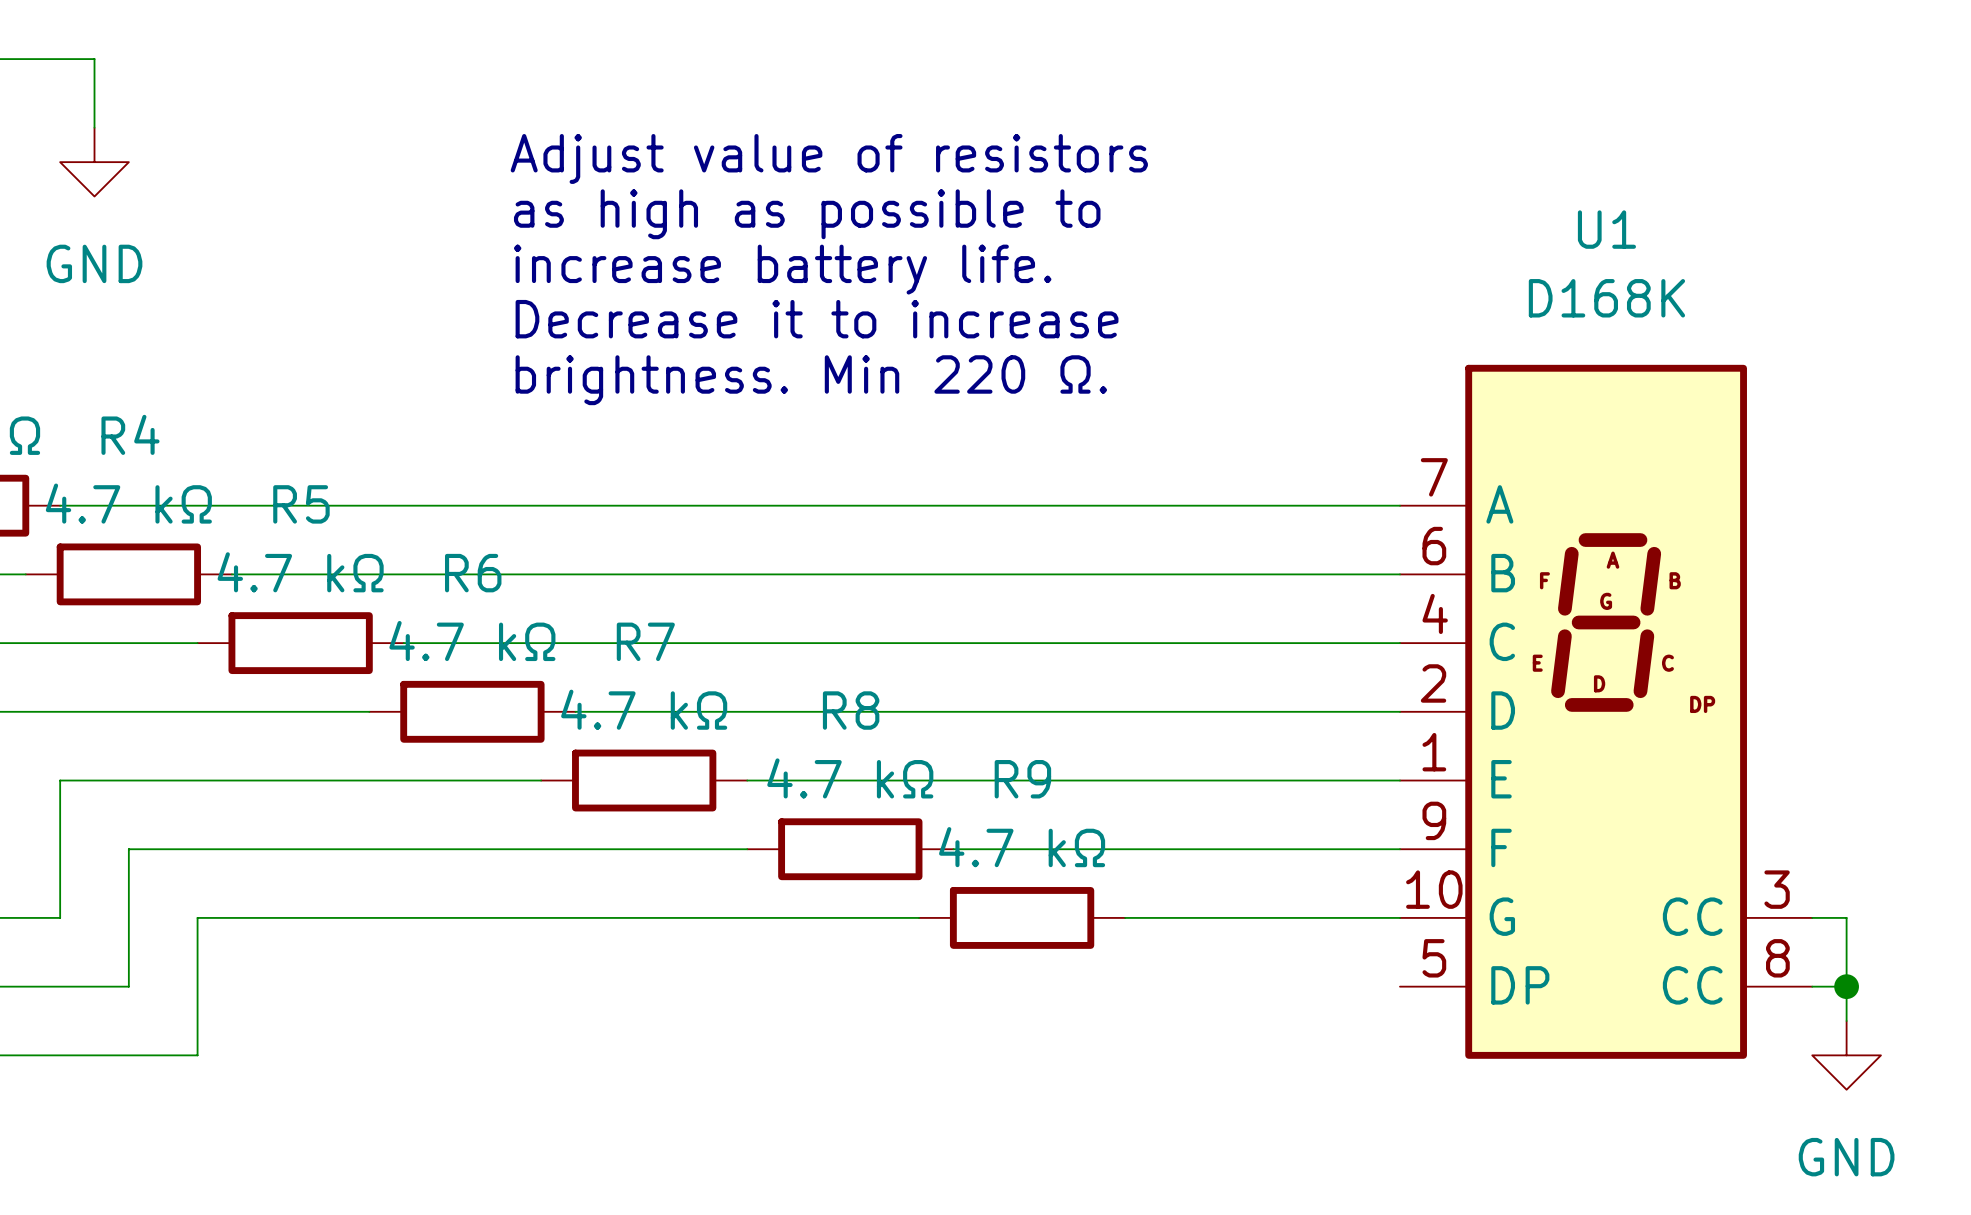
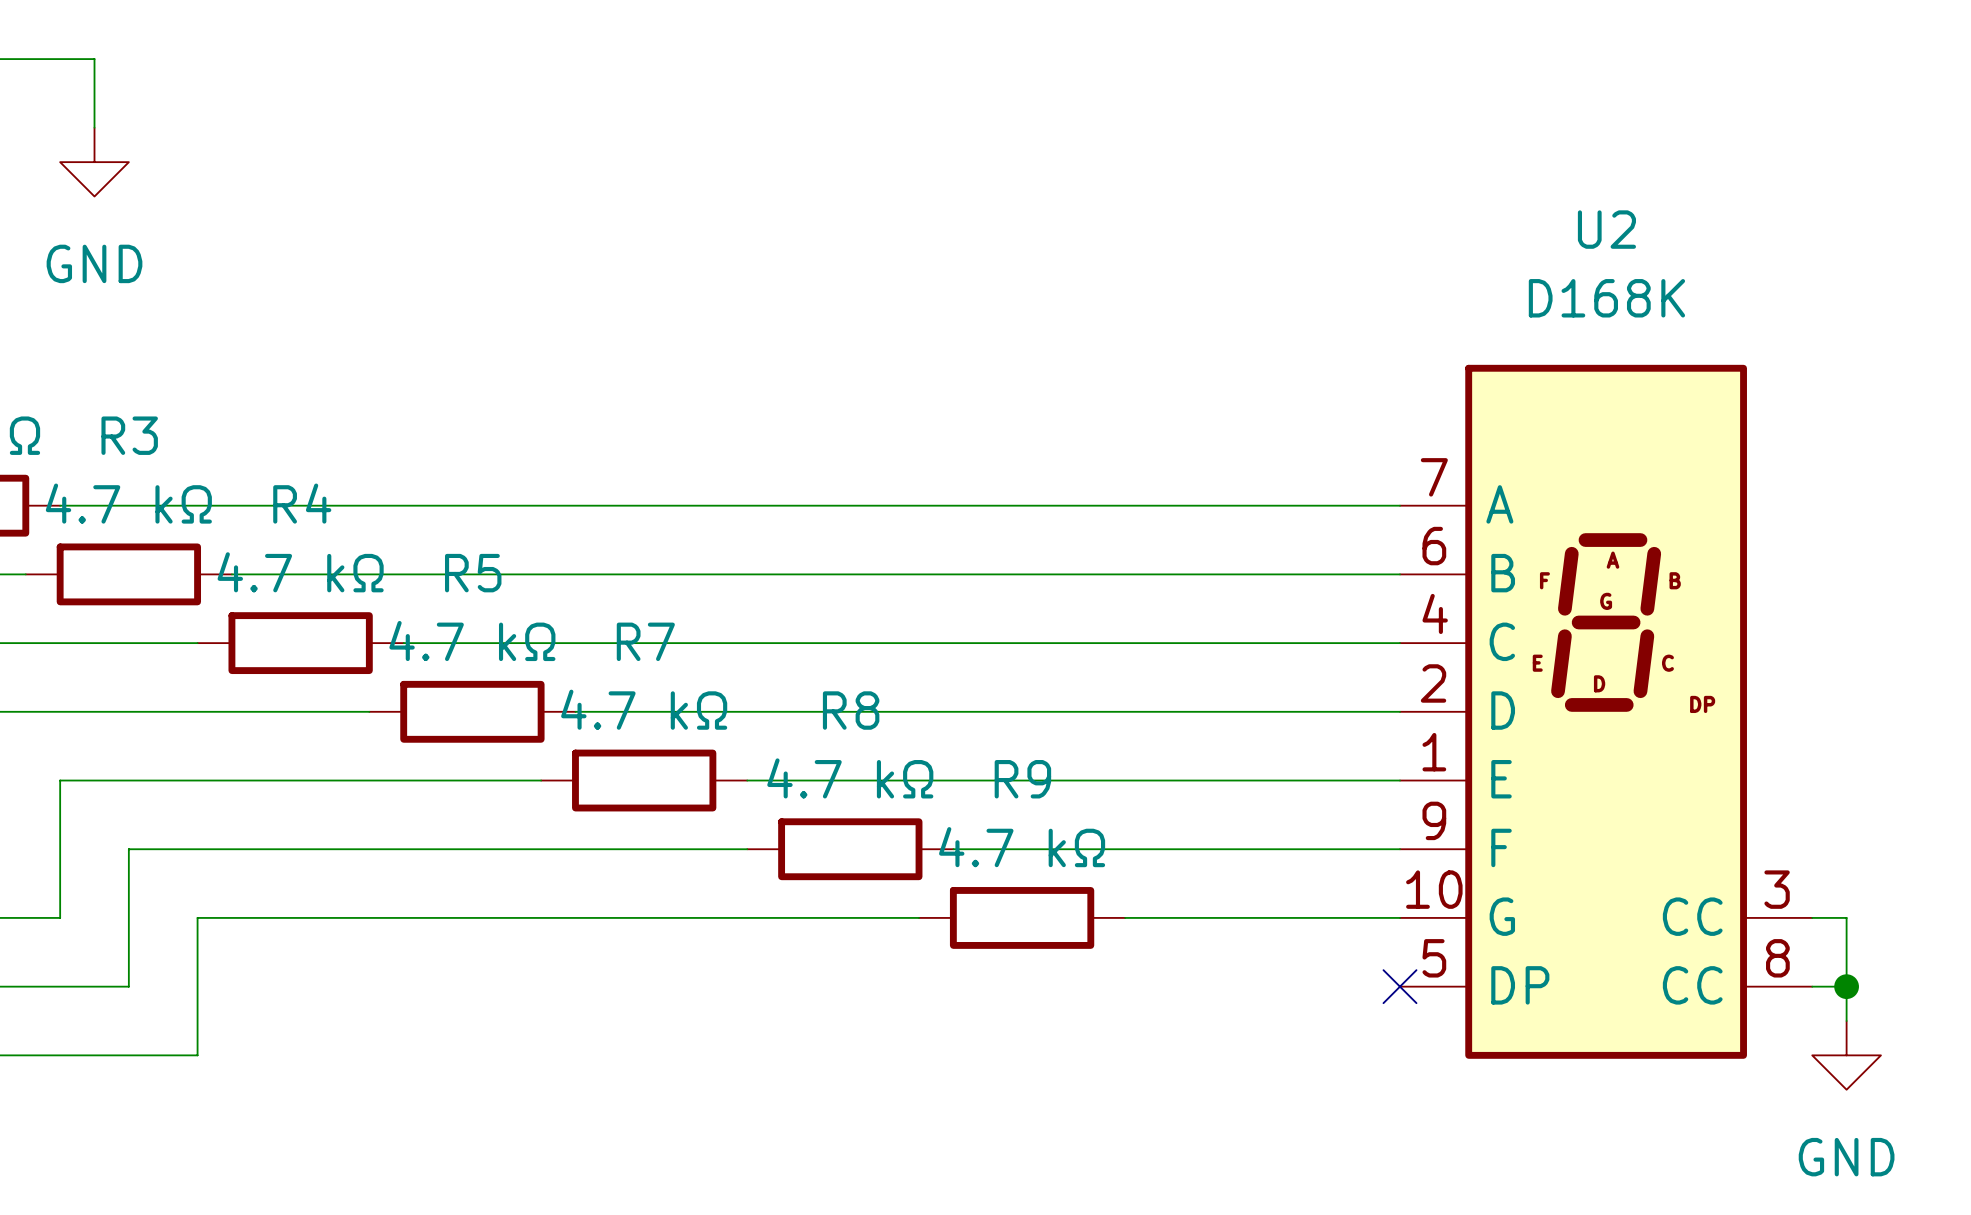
text: Adjust value of resistors (829, 158) -> none
text: as high as possible to (807, 214) -> none
U1 name: U1 (1606, 229) -> U2 (1606, 229)
text: increase battery life. (782, 269) -> none
text: Decrease it to increase (817, 319) -> none
text: brightness. Min 220 Ω. (811, 380) -> none
R4 name: R4 (130, 434) -> R3 (129, 435)
R5 name: R5 (301, 504) -> R4 (302, 503)
R6 name: R6 (473, 573) -> R5 (473, 573)
no-connect mark: none -> (1399, 986)

